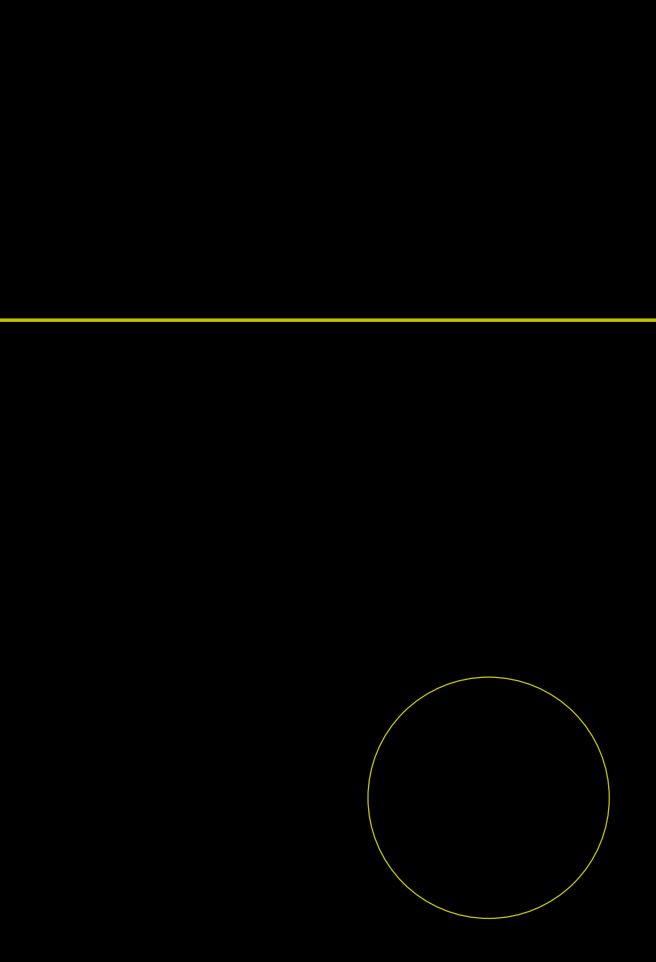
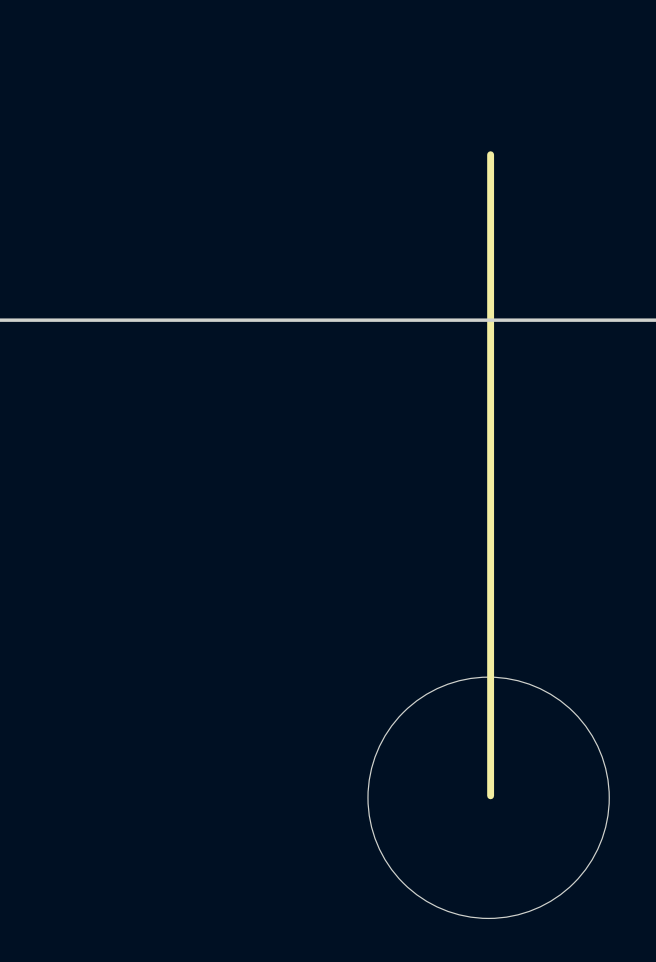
line: none -> (490, 154) (490, 795)

